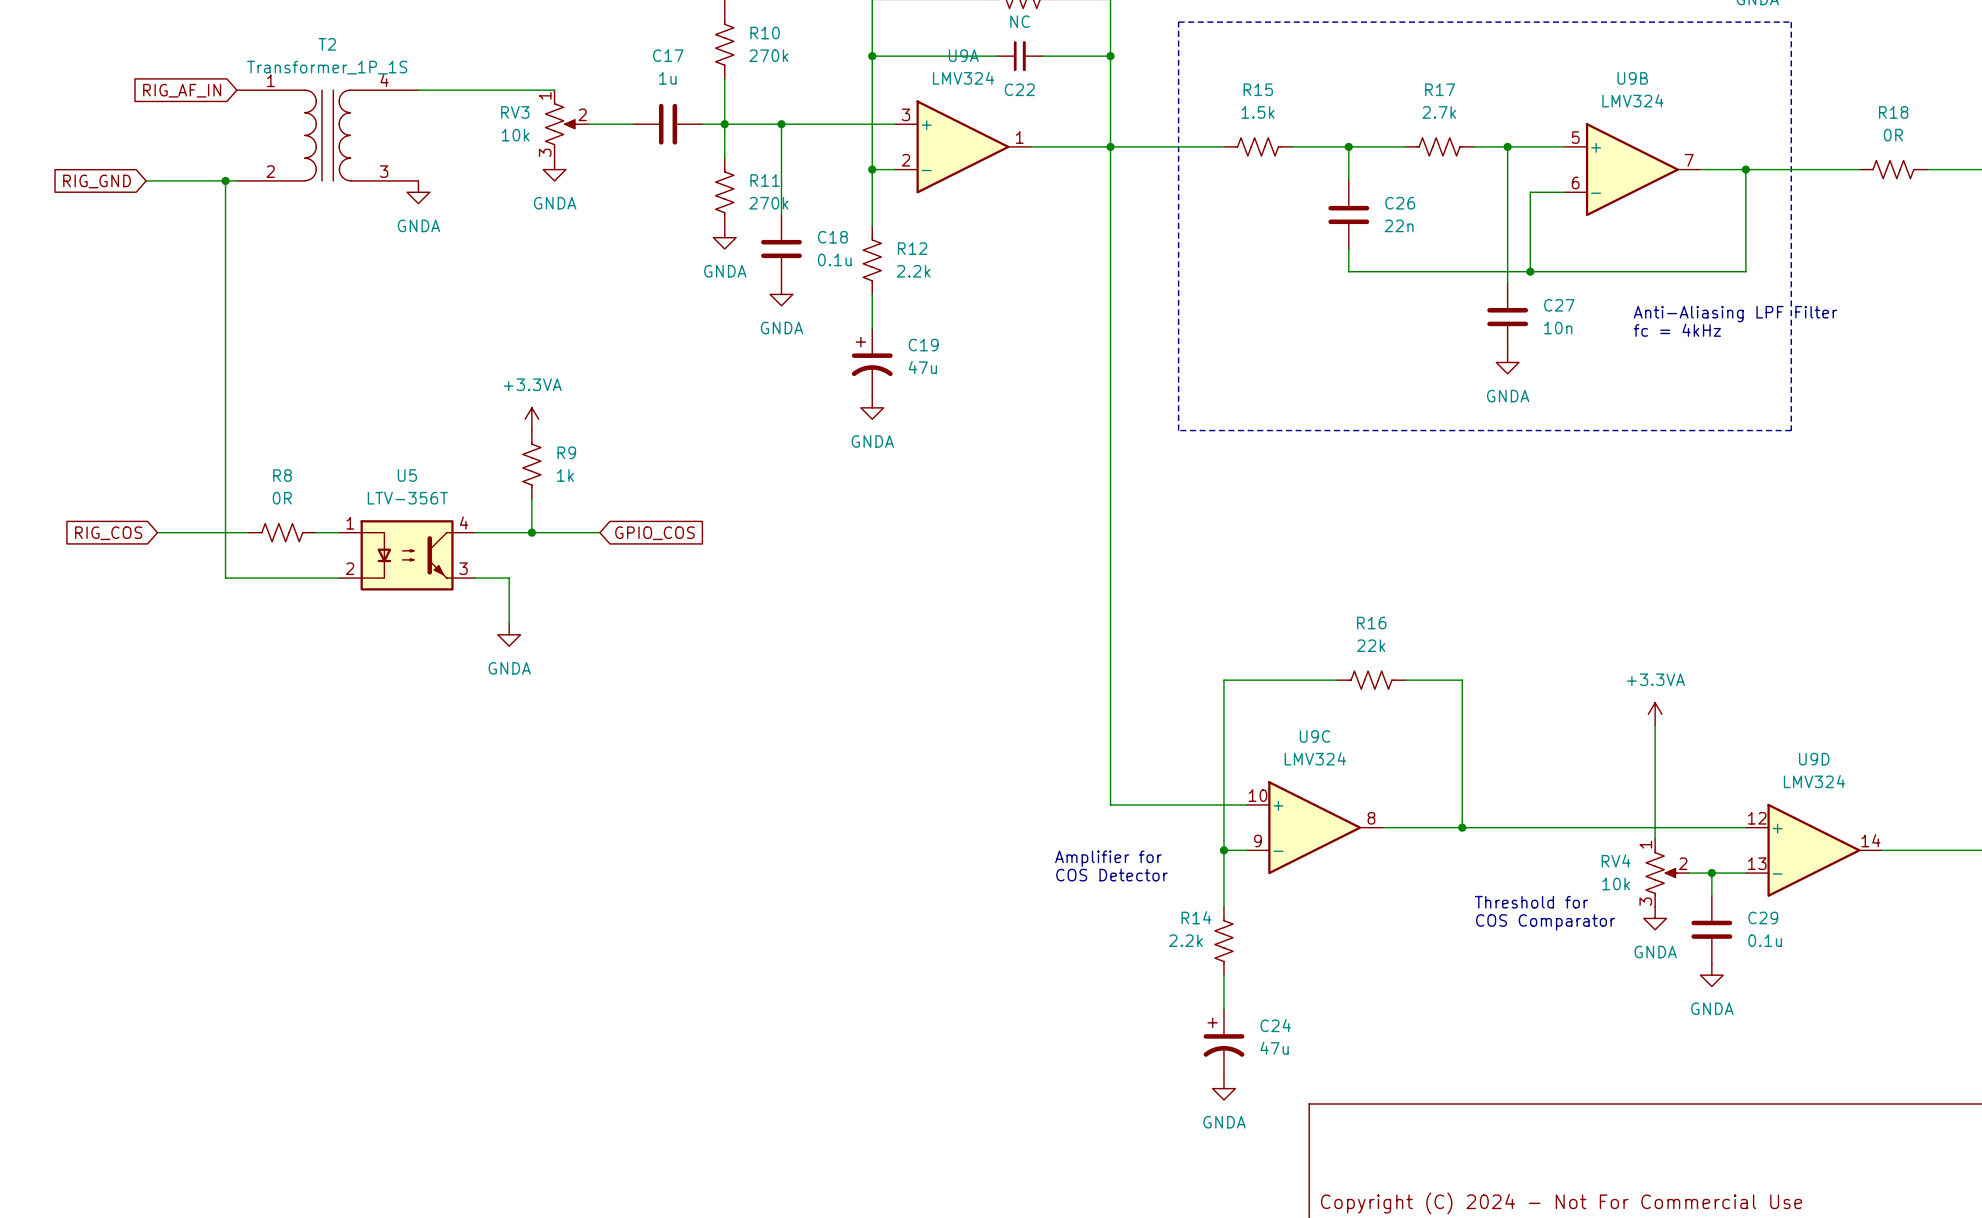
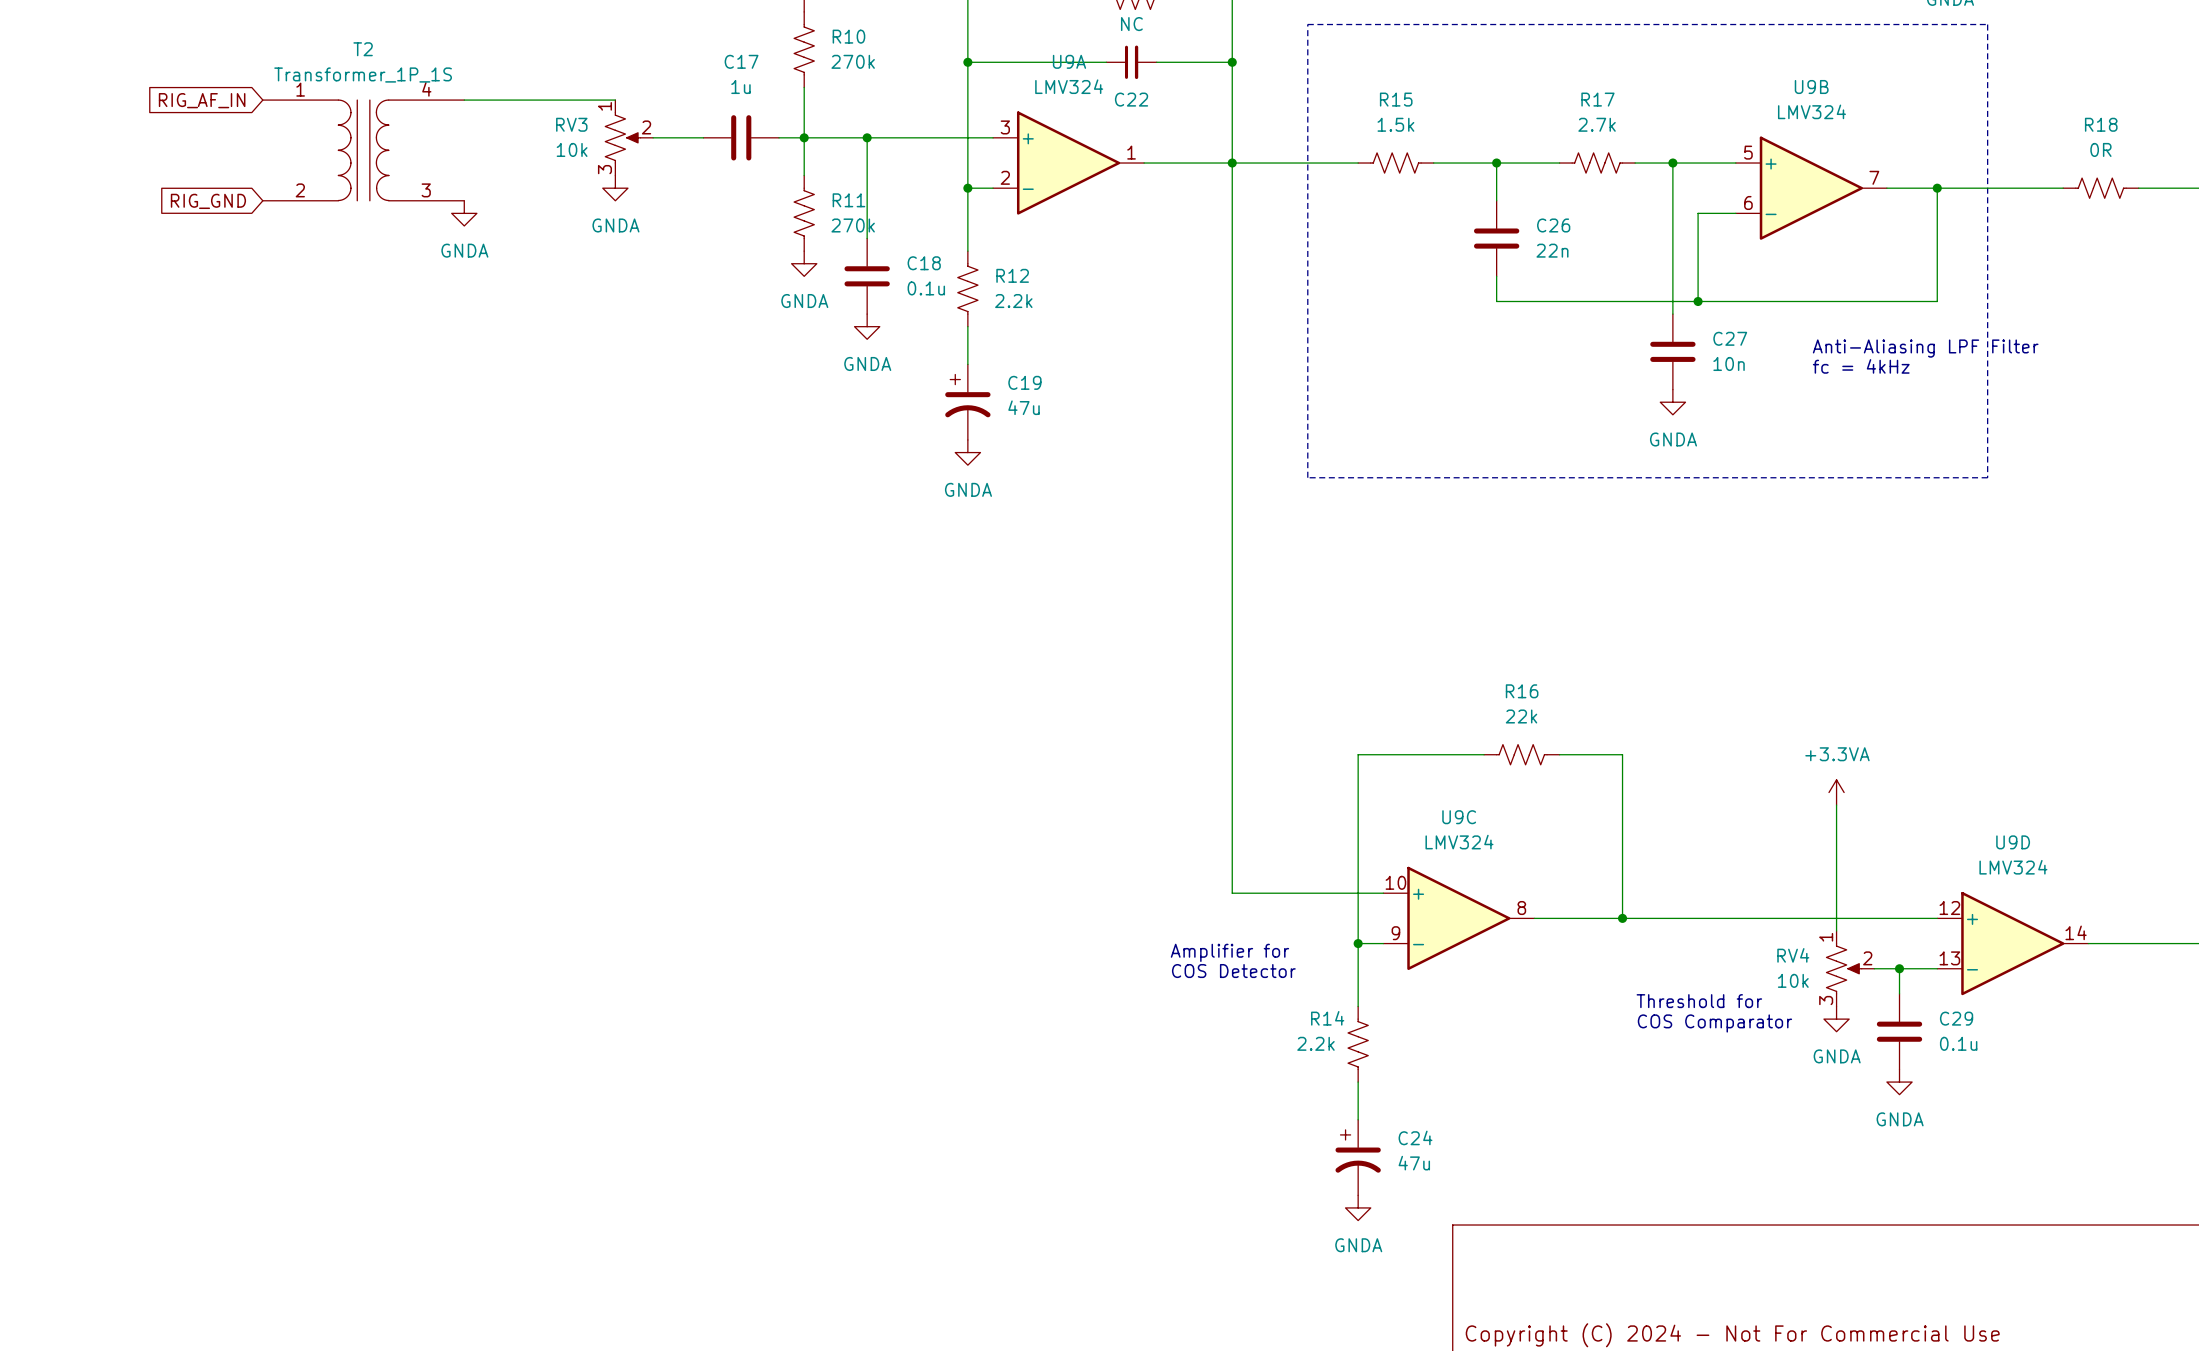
wire: (146, 180) (236, 180) -> none
wire: (225, 180) (225, 578) (338, 578) -> none
junction: (225, 180) -> none
global label position: RIG_GND (97, 181) -> RIG_GND (208, 201)
power symbol: +3.3VA (531, 419) -> none
R9: 1k (531, 464) -> none
wire: (531, 498) (531, 532) -> none
wire: (157, 532) (248, 532) -> none
R8: 0R (282, 532) -> none
wire: (316, 532) (338, 532) -> none
wire: (475, 532) (599, 532) -> none
junction: (531, 532) -> none
global label: RIG_COS (108, 533) -> none
global label: GPIO_COS (654, 533) -> none
U5: LTV-356T (407, 555) -> none
wire: (475, 578) (509, 578) (509, 623) -> none
power symbol: GNDA (509, 634) -> none

